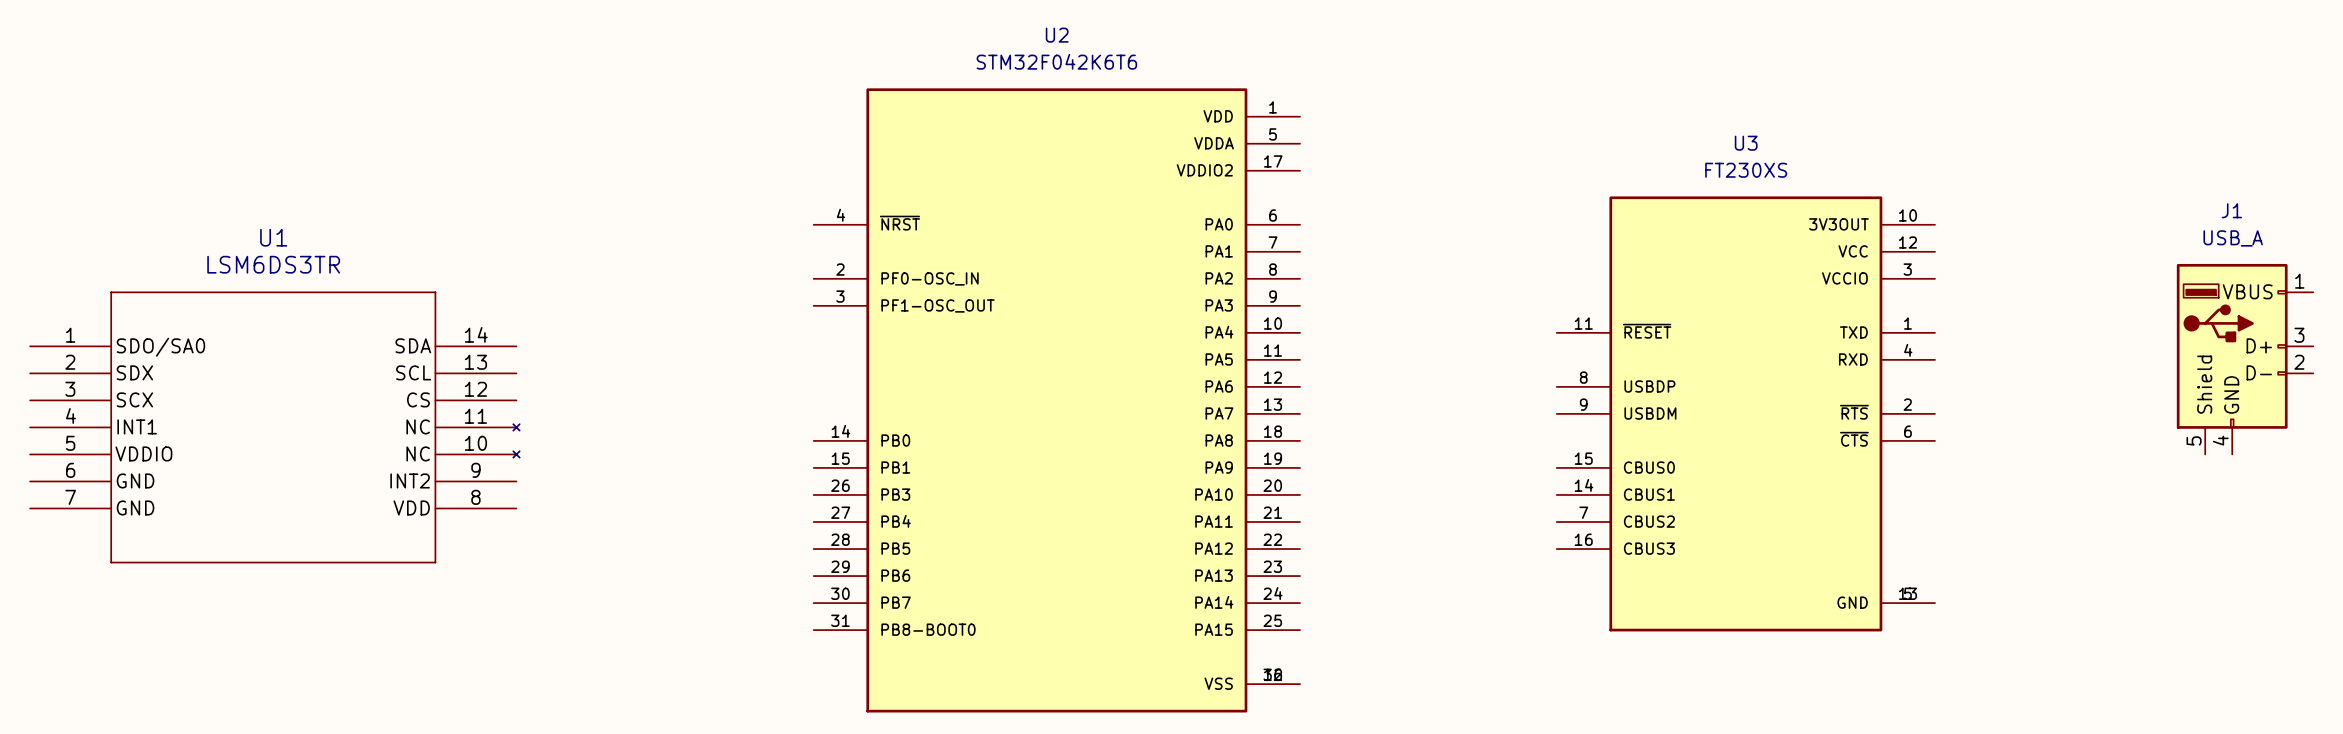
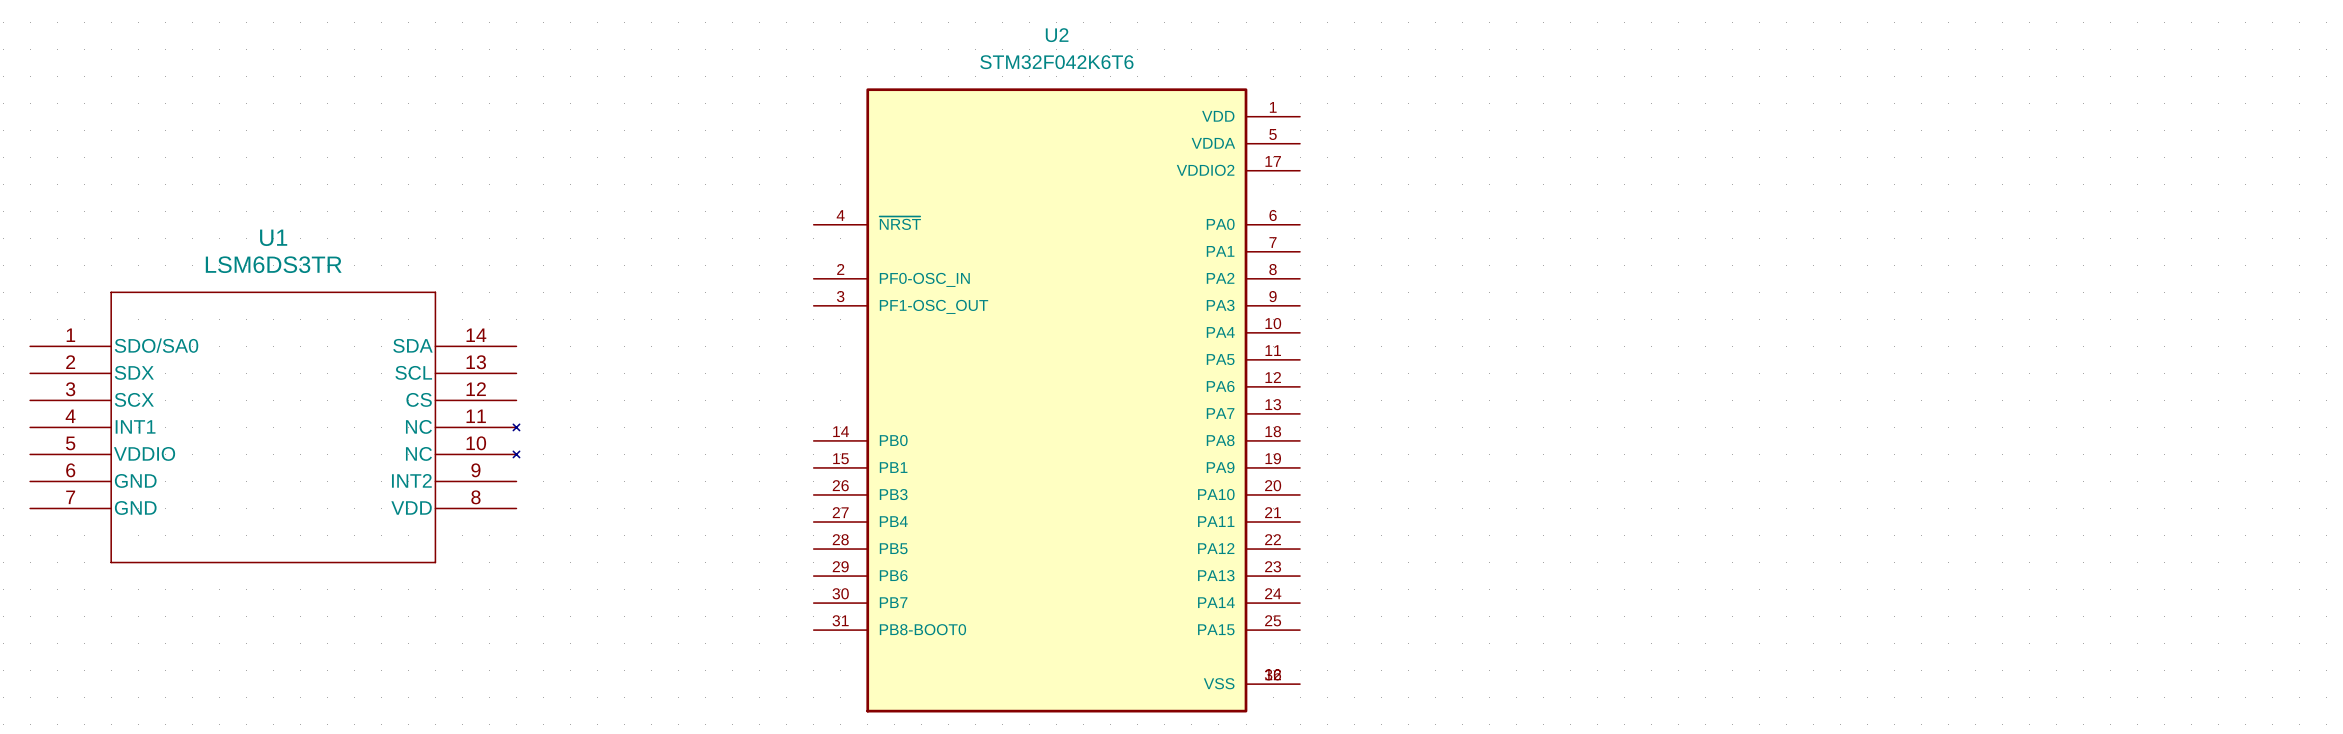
J1: USB_A (2245, 359) -> none
U3: FT230XS (1745, 413) -> none

